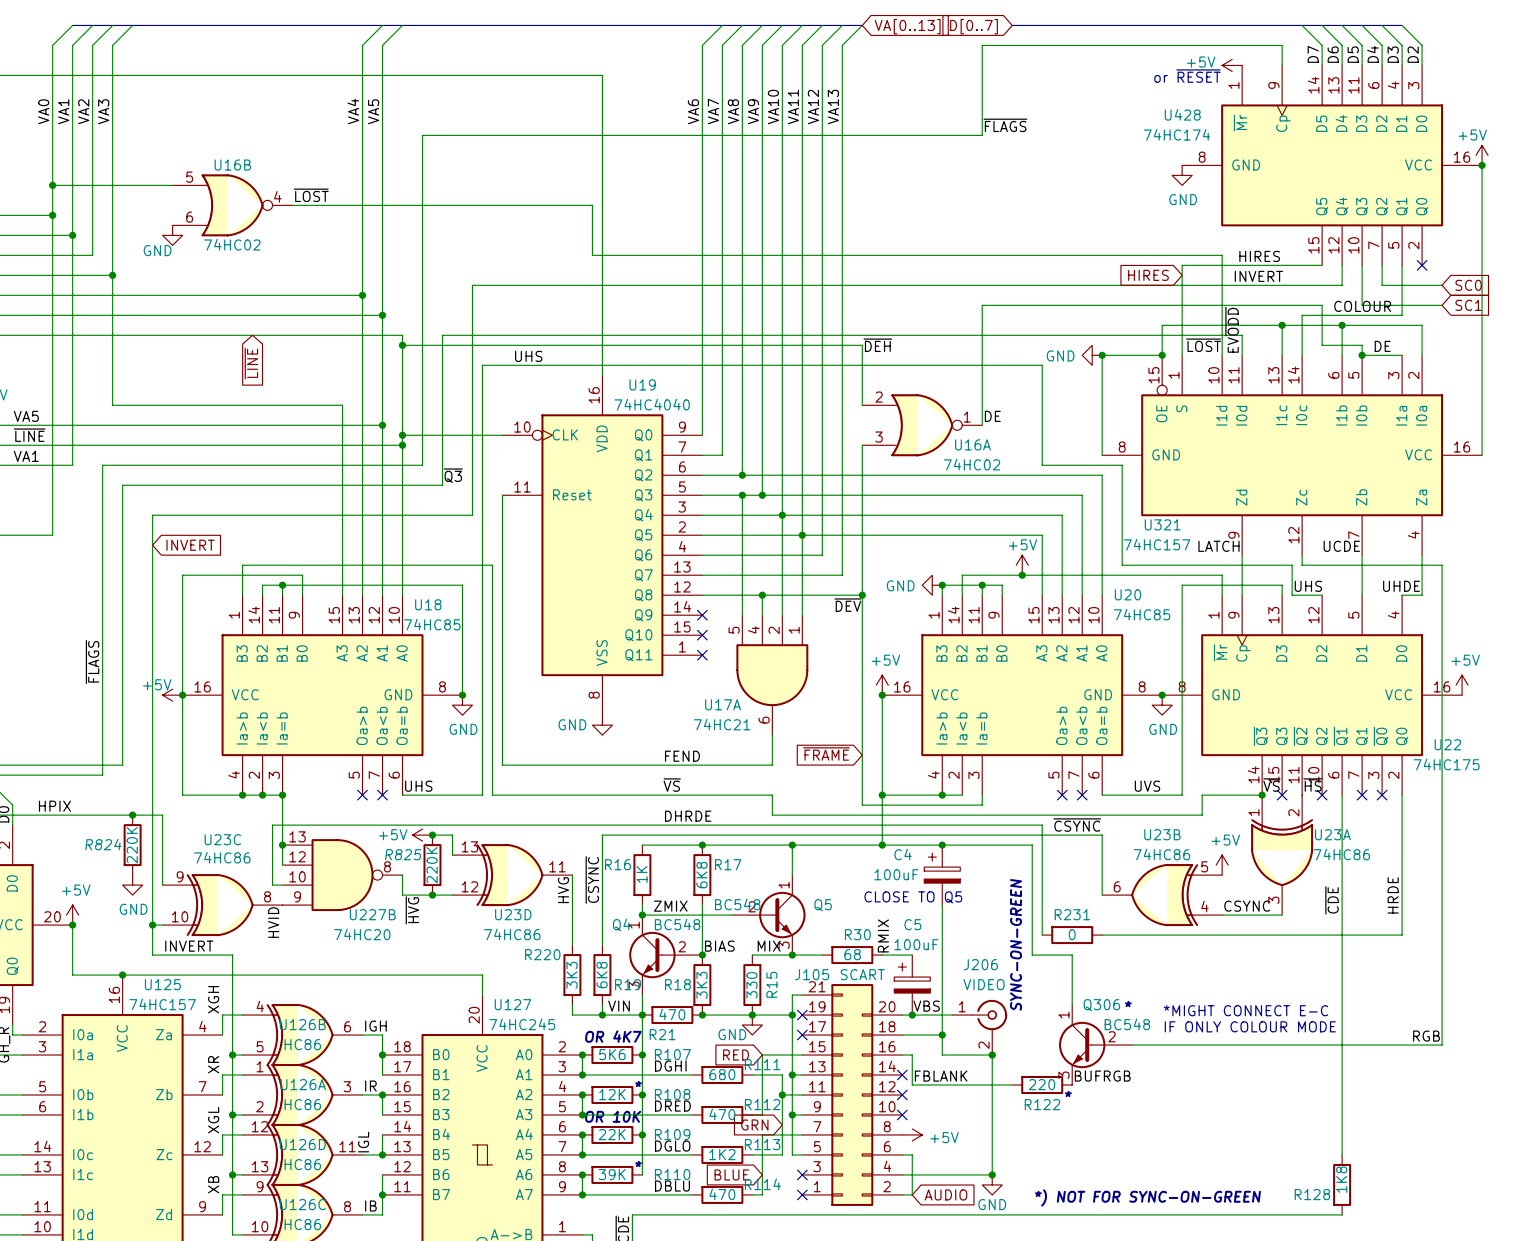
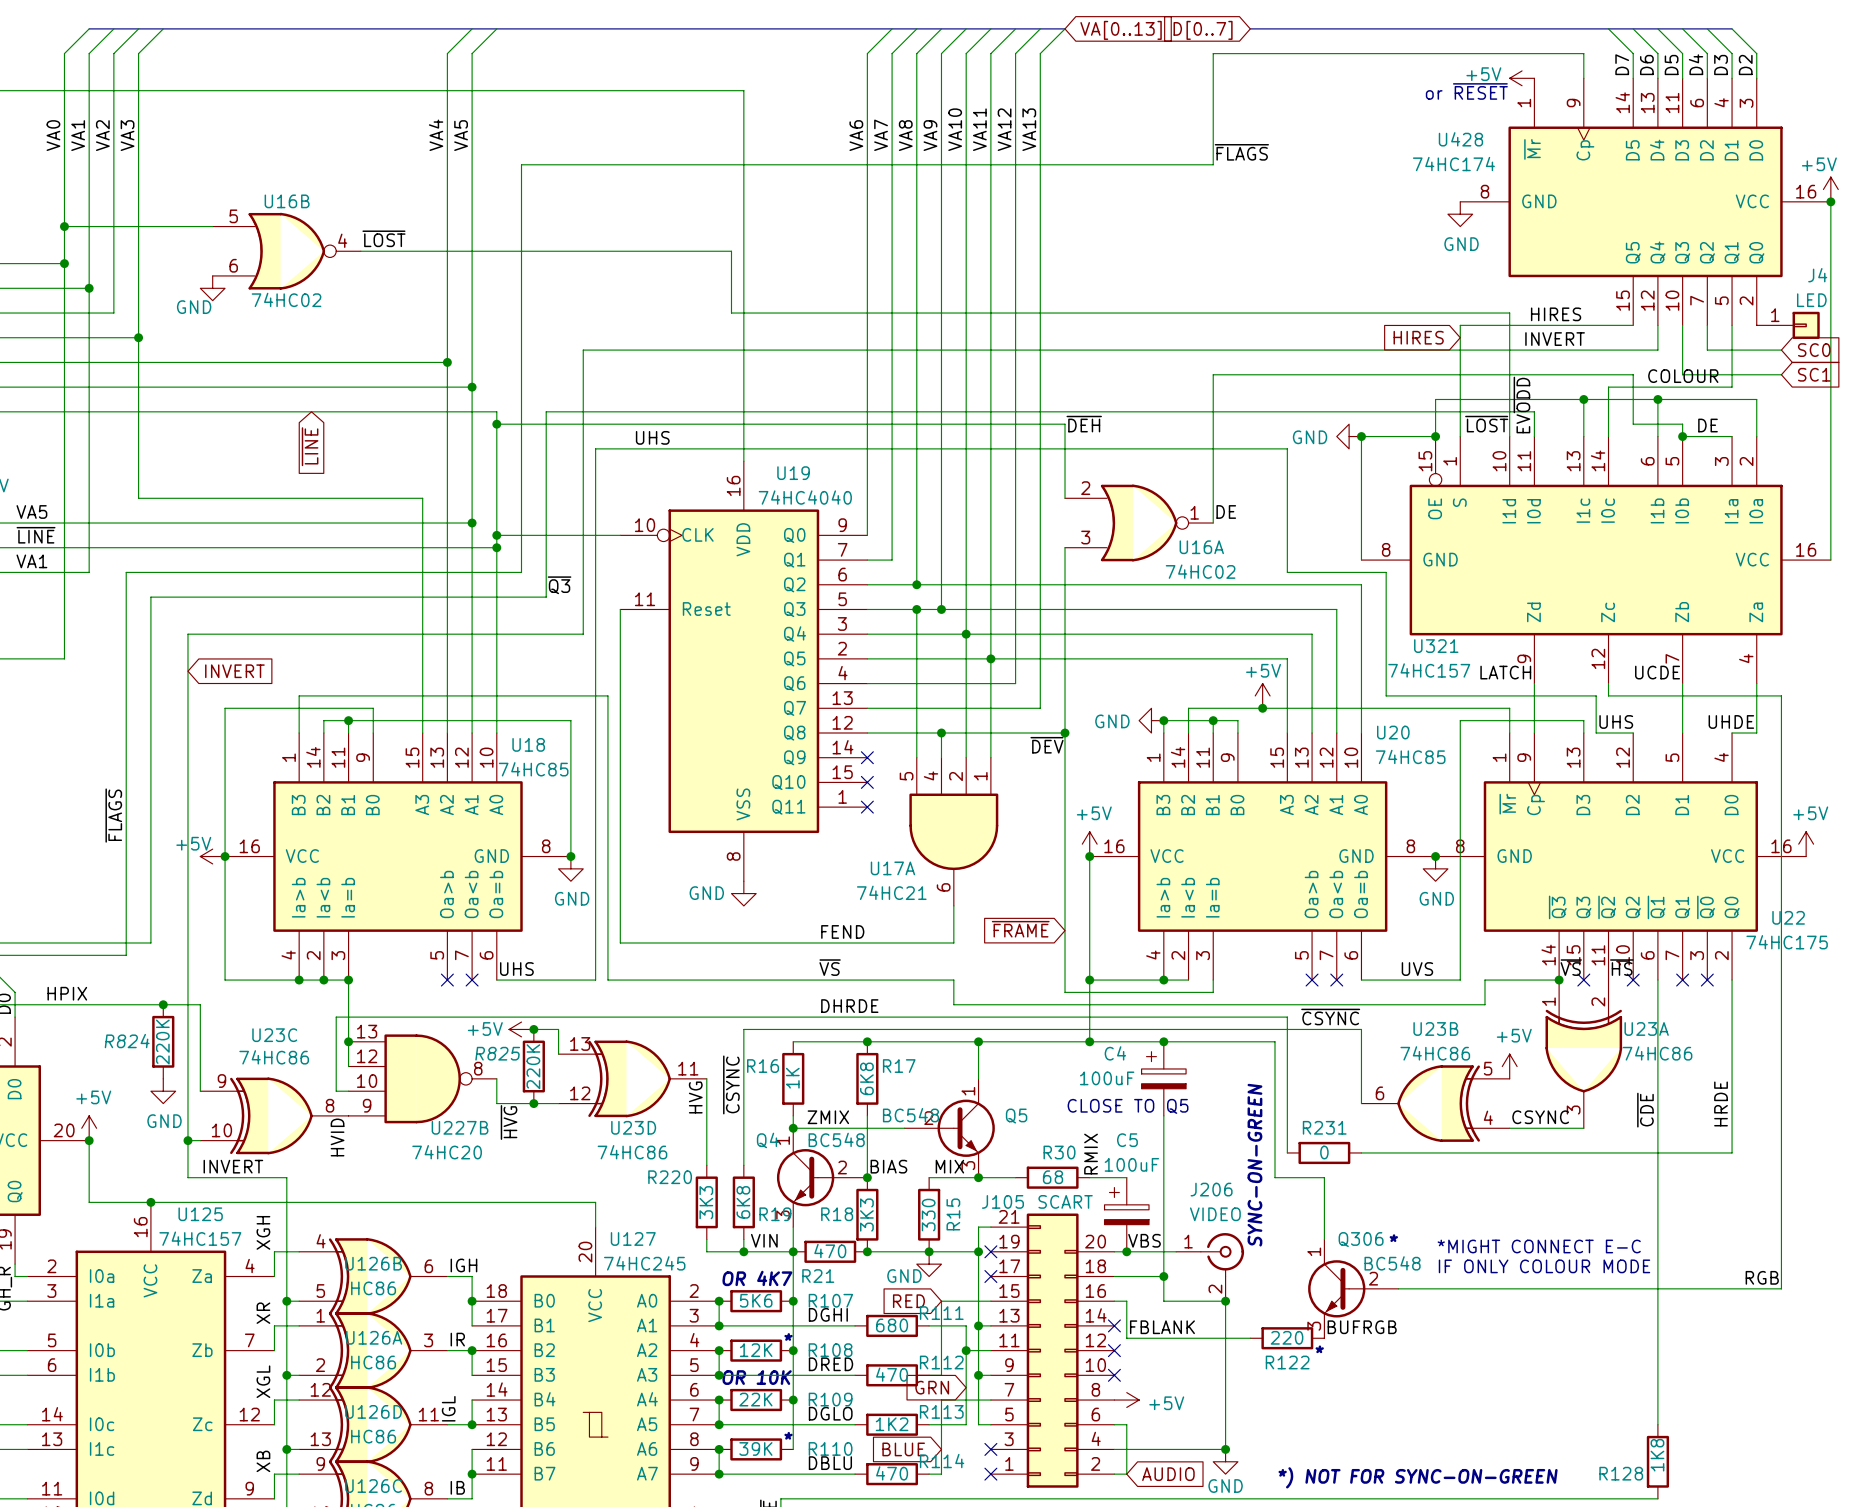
no-connect mark: (1422, 265) -> none
J4: none -> LED (1788, 325)

